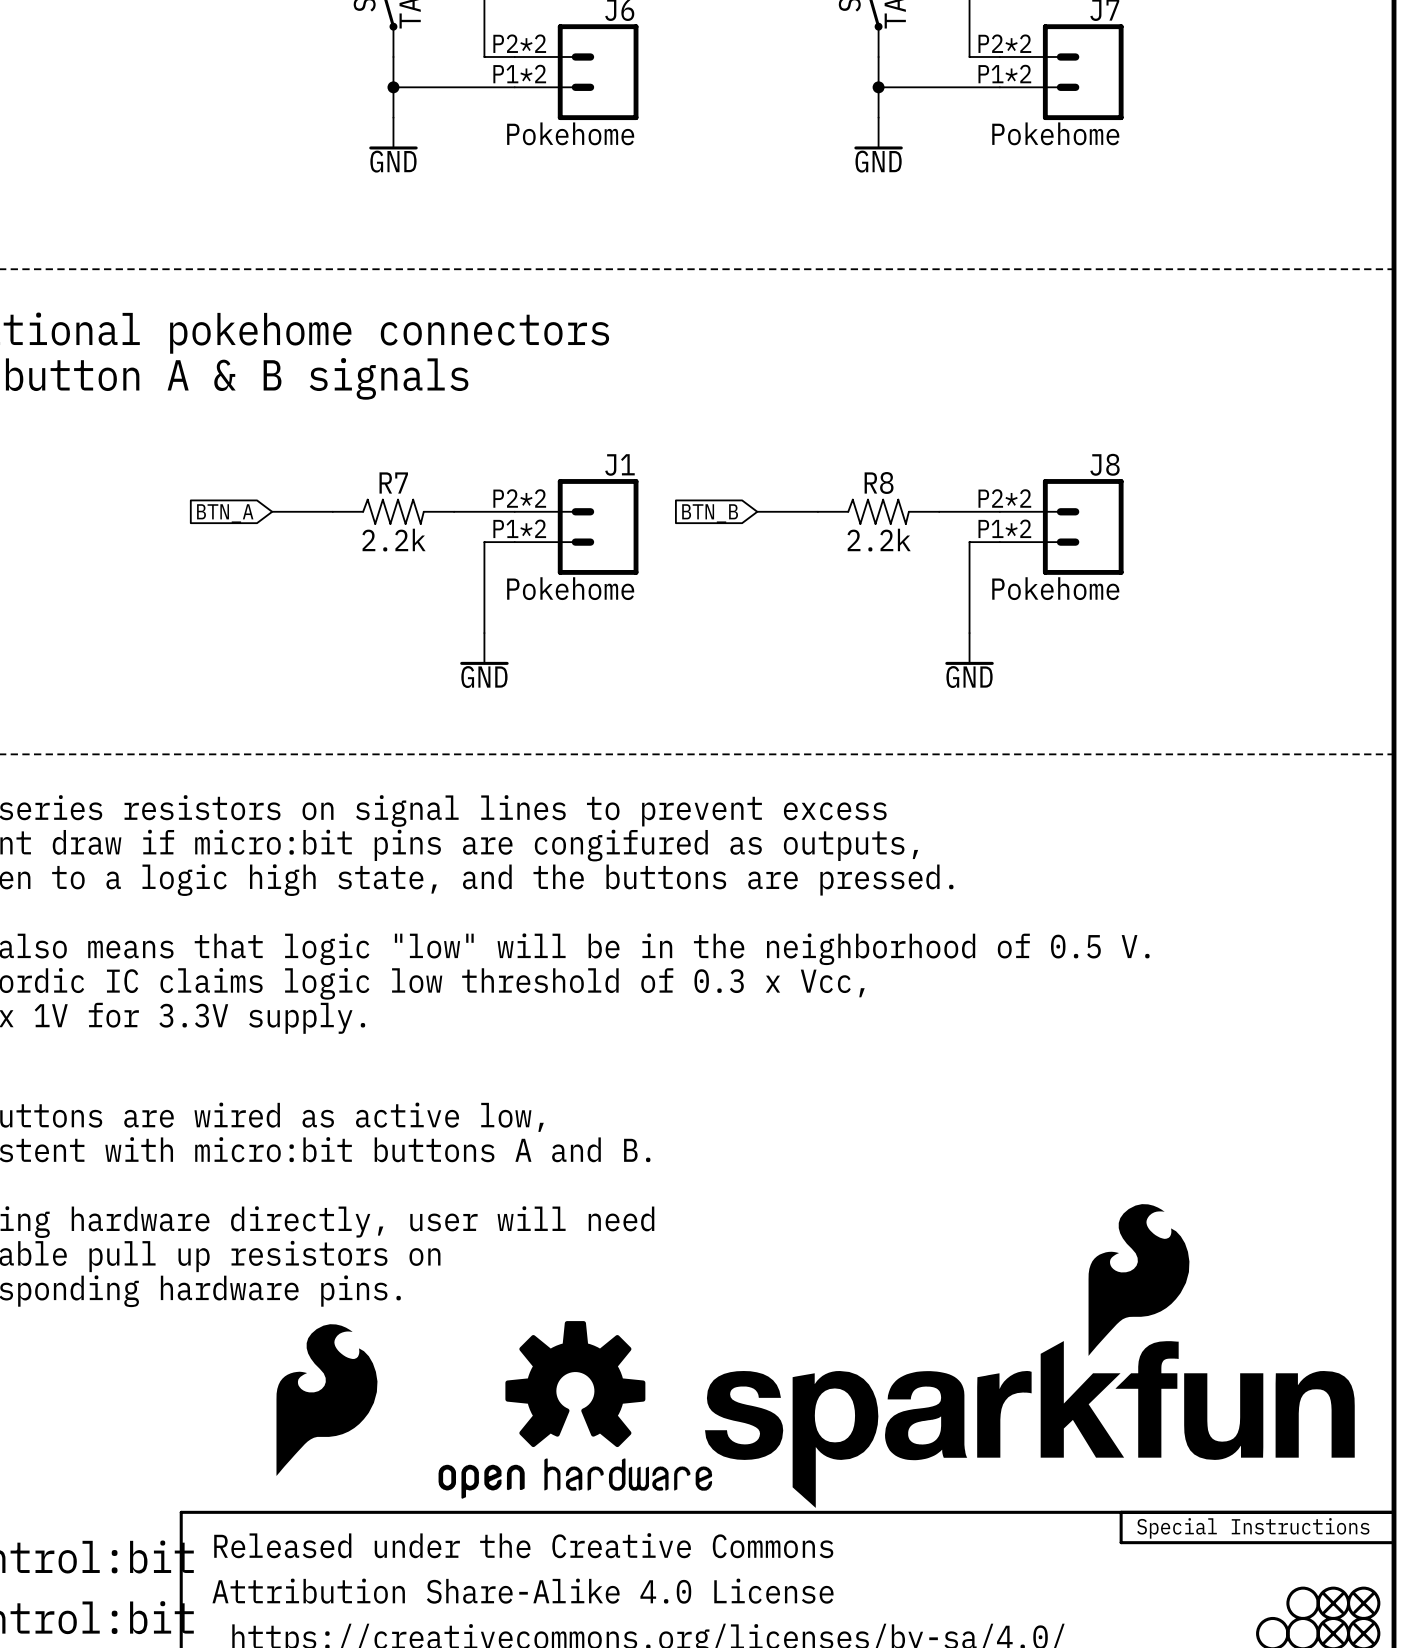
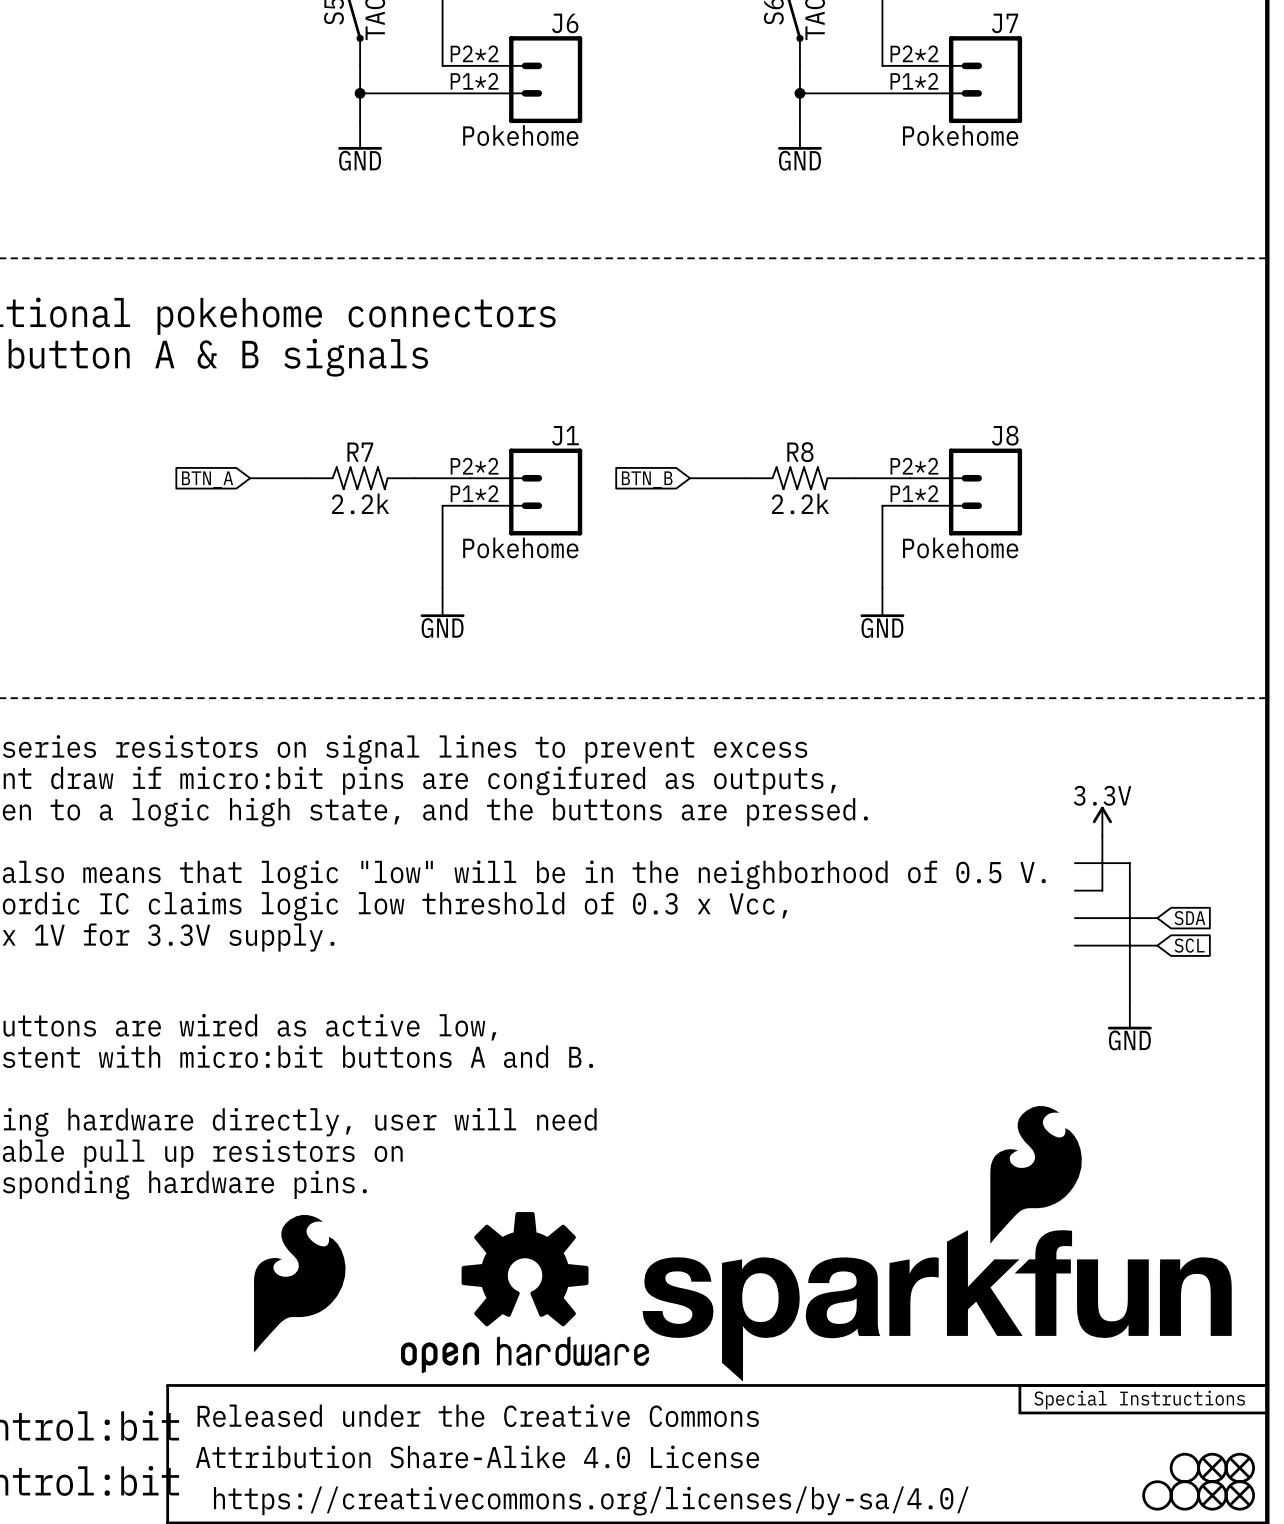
power symbol: none -> 3.3V (1102, 821)
wire: none -> (1102, 835) (1102, 890) (1074, 890)
wire: none -> (1074, 863) (1129, 863) (1129, 1000)
wire: none -> (1074, 918) (1157, 918)
global label: none -> SDA (1189, 918)
wire: none -> (1074, 945) (1157, 945)
global label: none -> SCL (1189, 945)
power symbol: none -> GND (1129, 1015)

